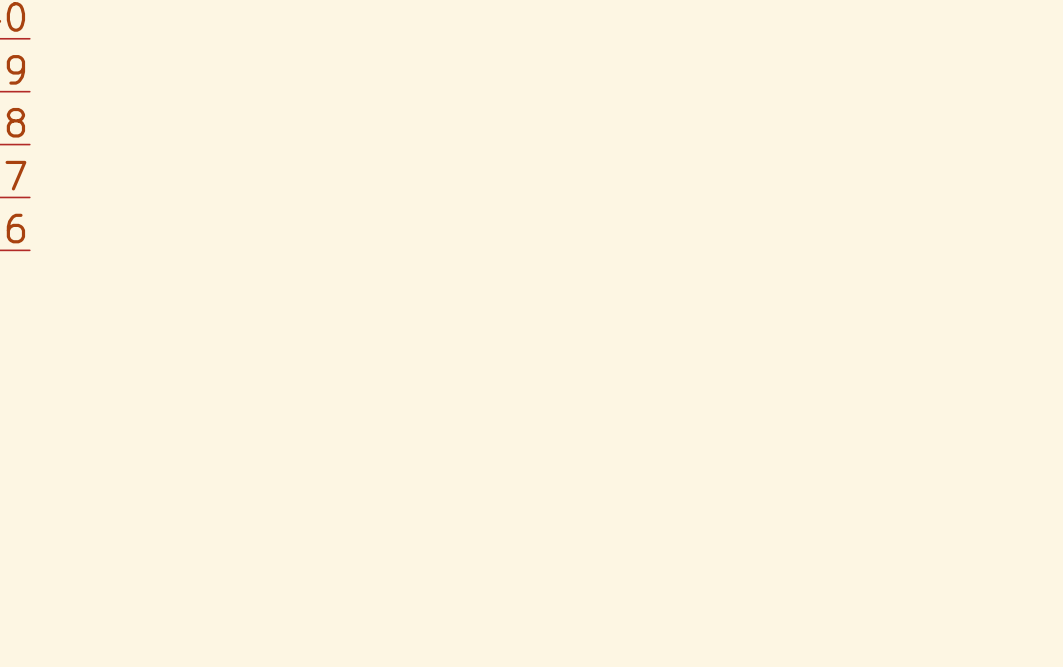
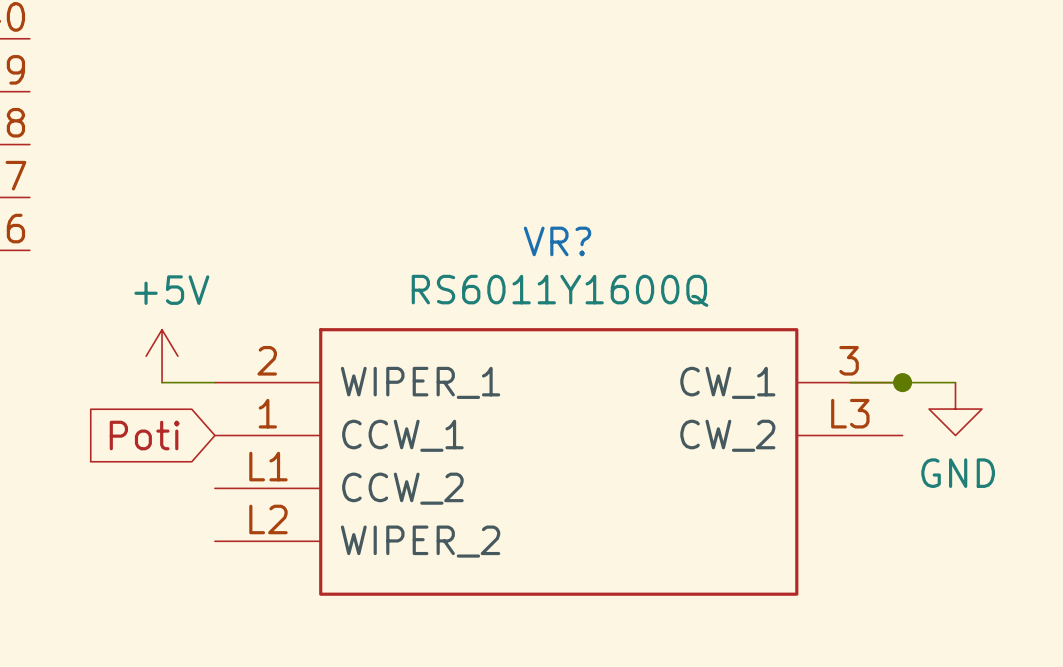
power symbol: none -> +5V (162, 356)
wire: none -> (162, 382) (214, 382)
wire: none -> (849, 382) (955, 382)
junction: none -> (902, 382)
power symbol: none -> GND (955, 409)
global label: none -> Poti (144, 435)
VR?: none -> RS6011Y1600Q (558, 461)

